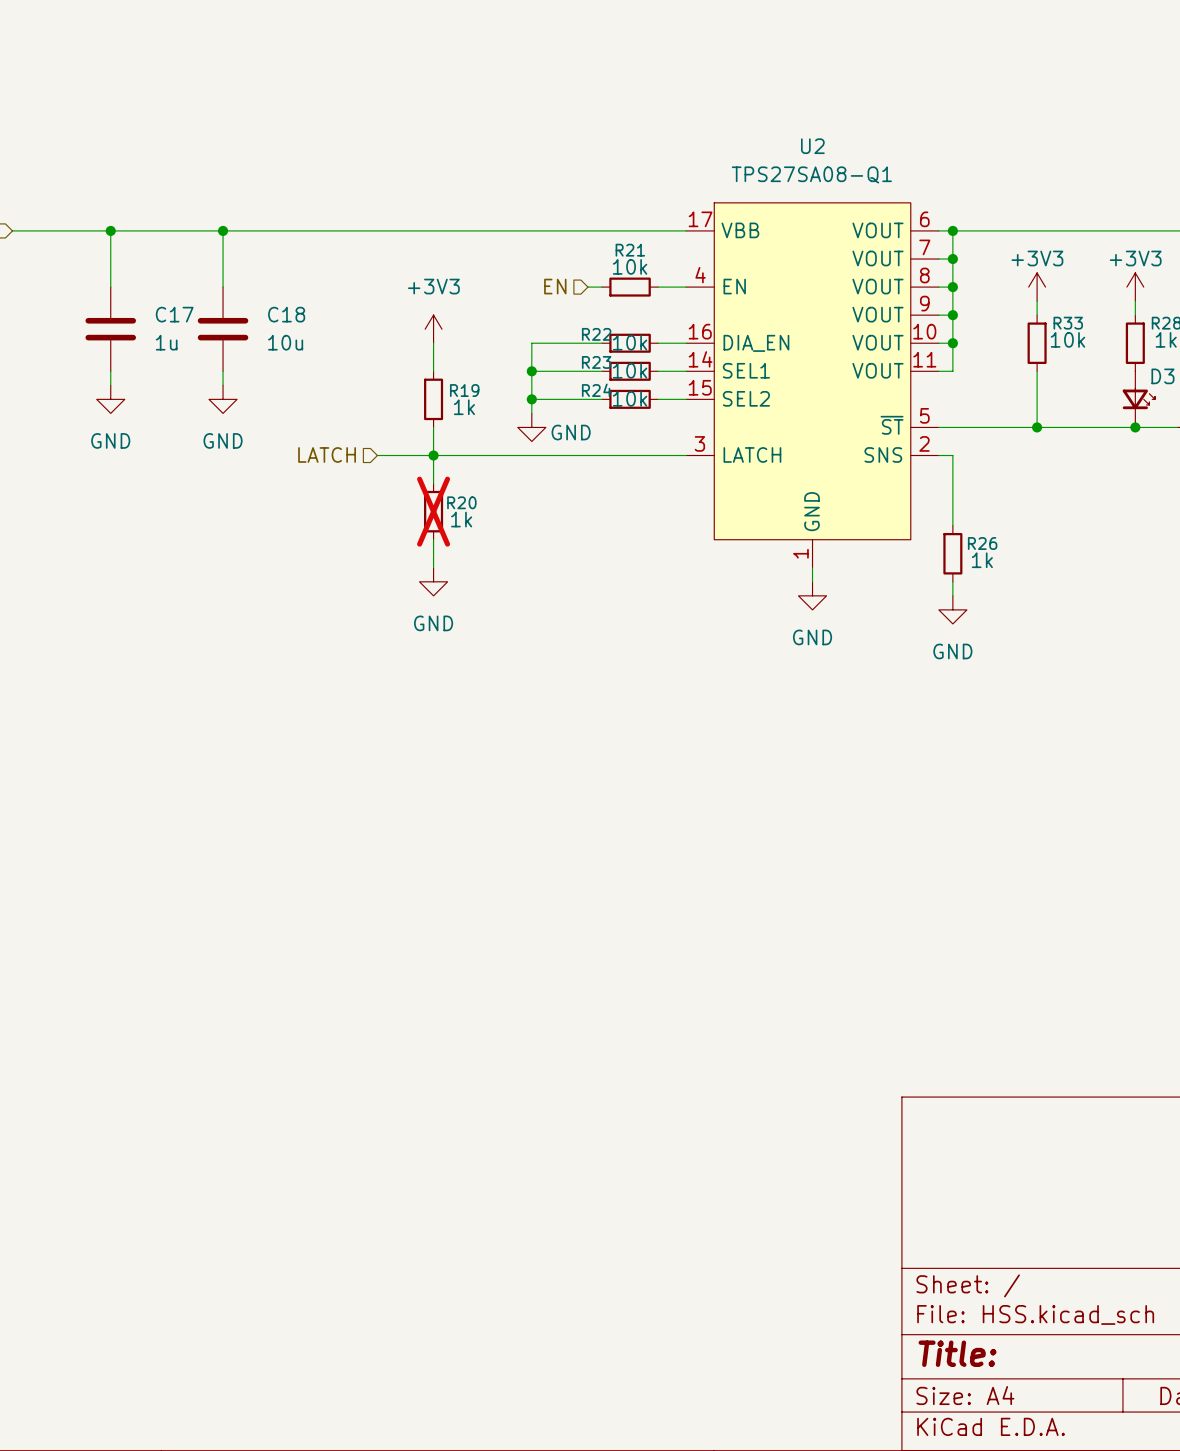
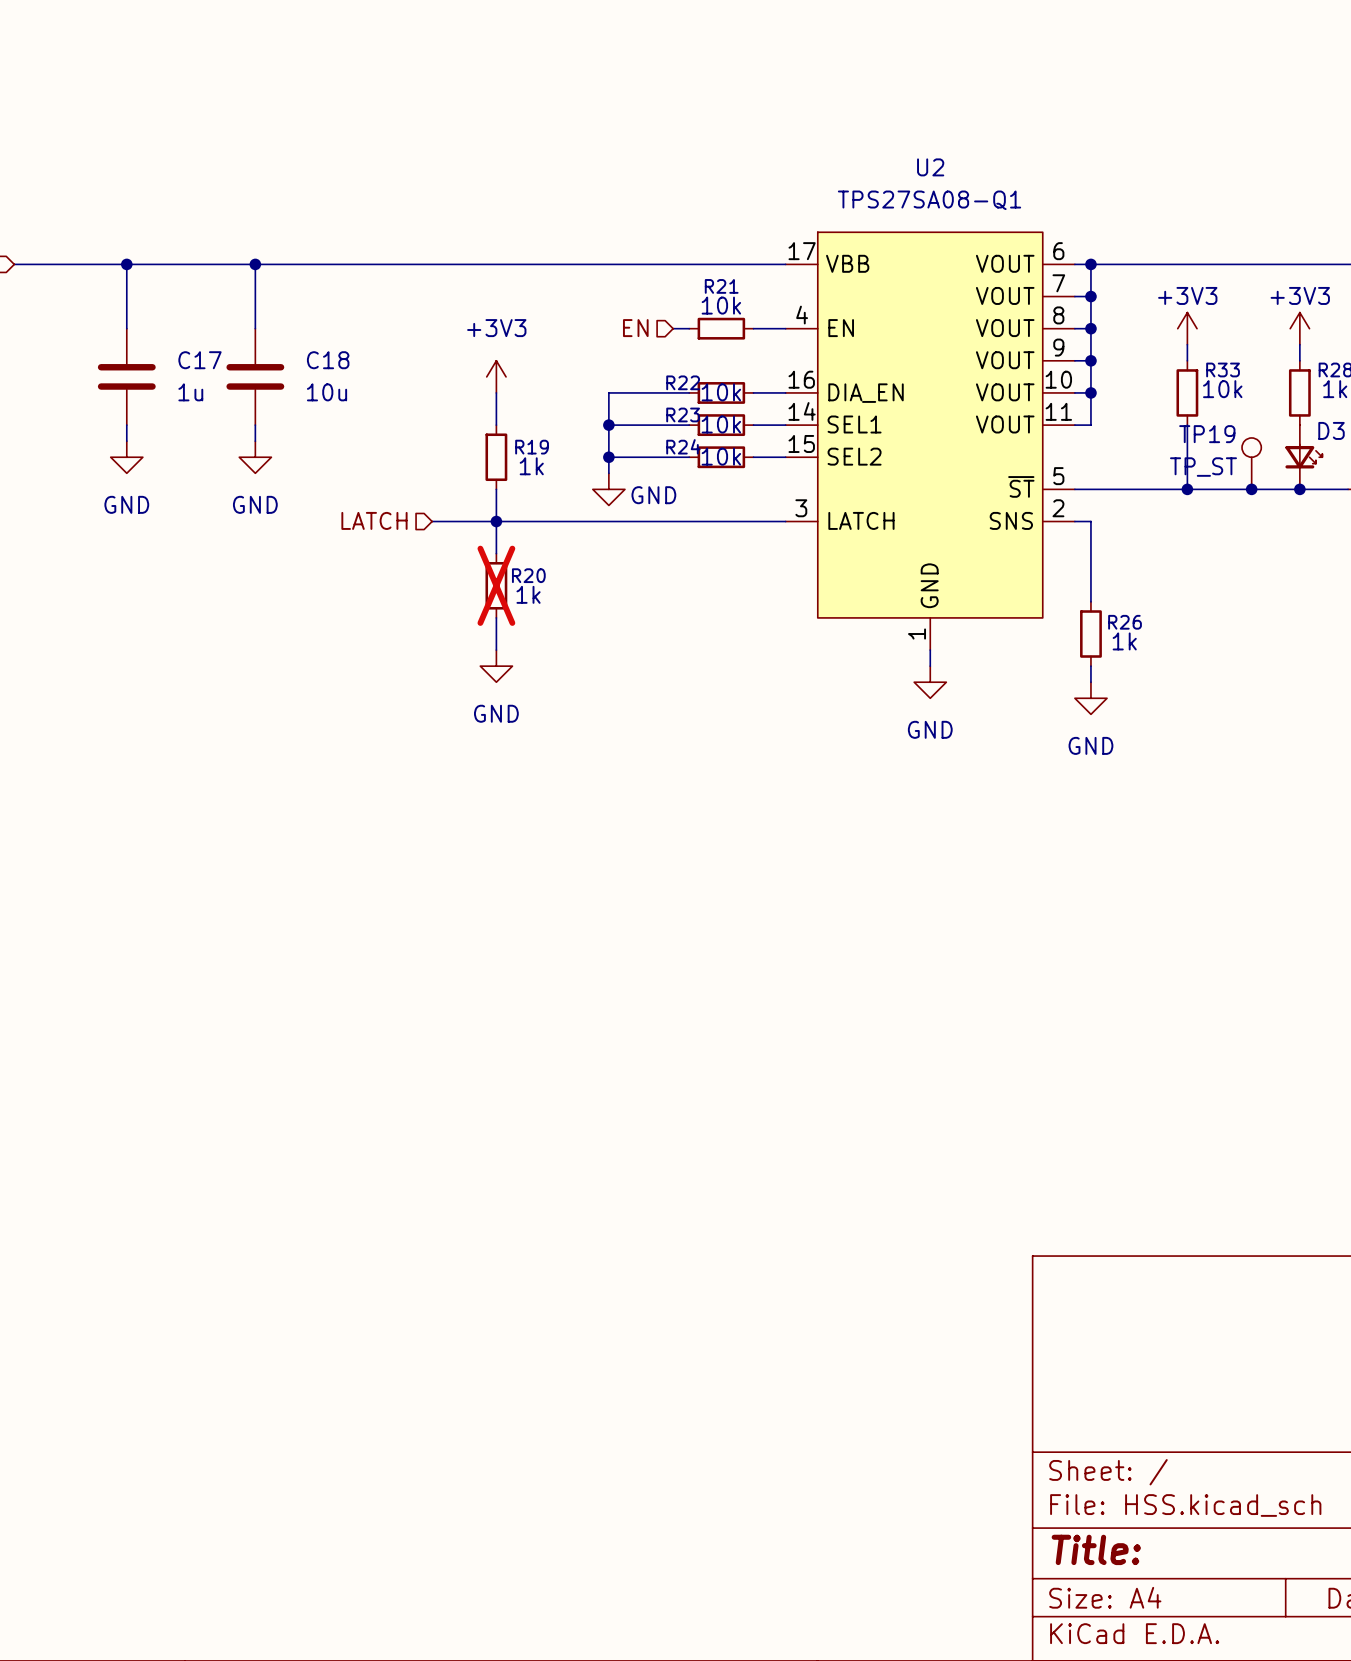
TP19: none -> TP_ST (1251, 463)
junction: none -> (1251, 489)

